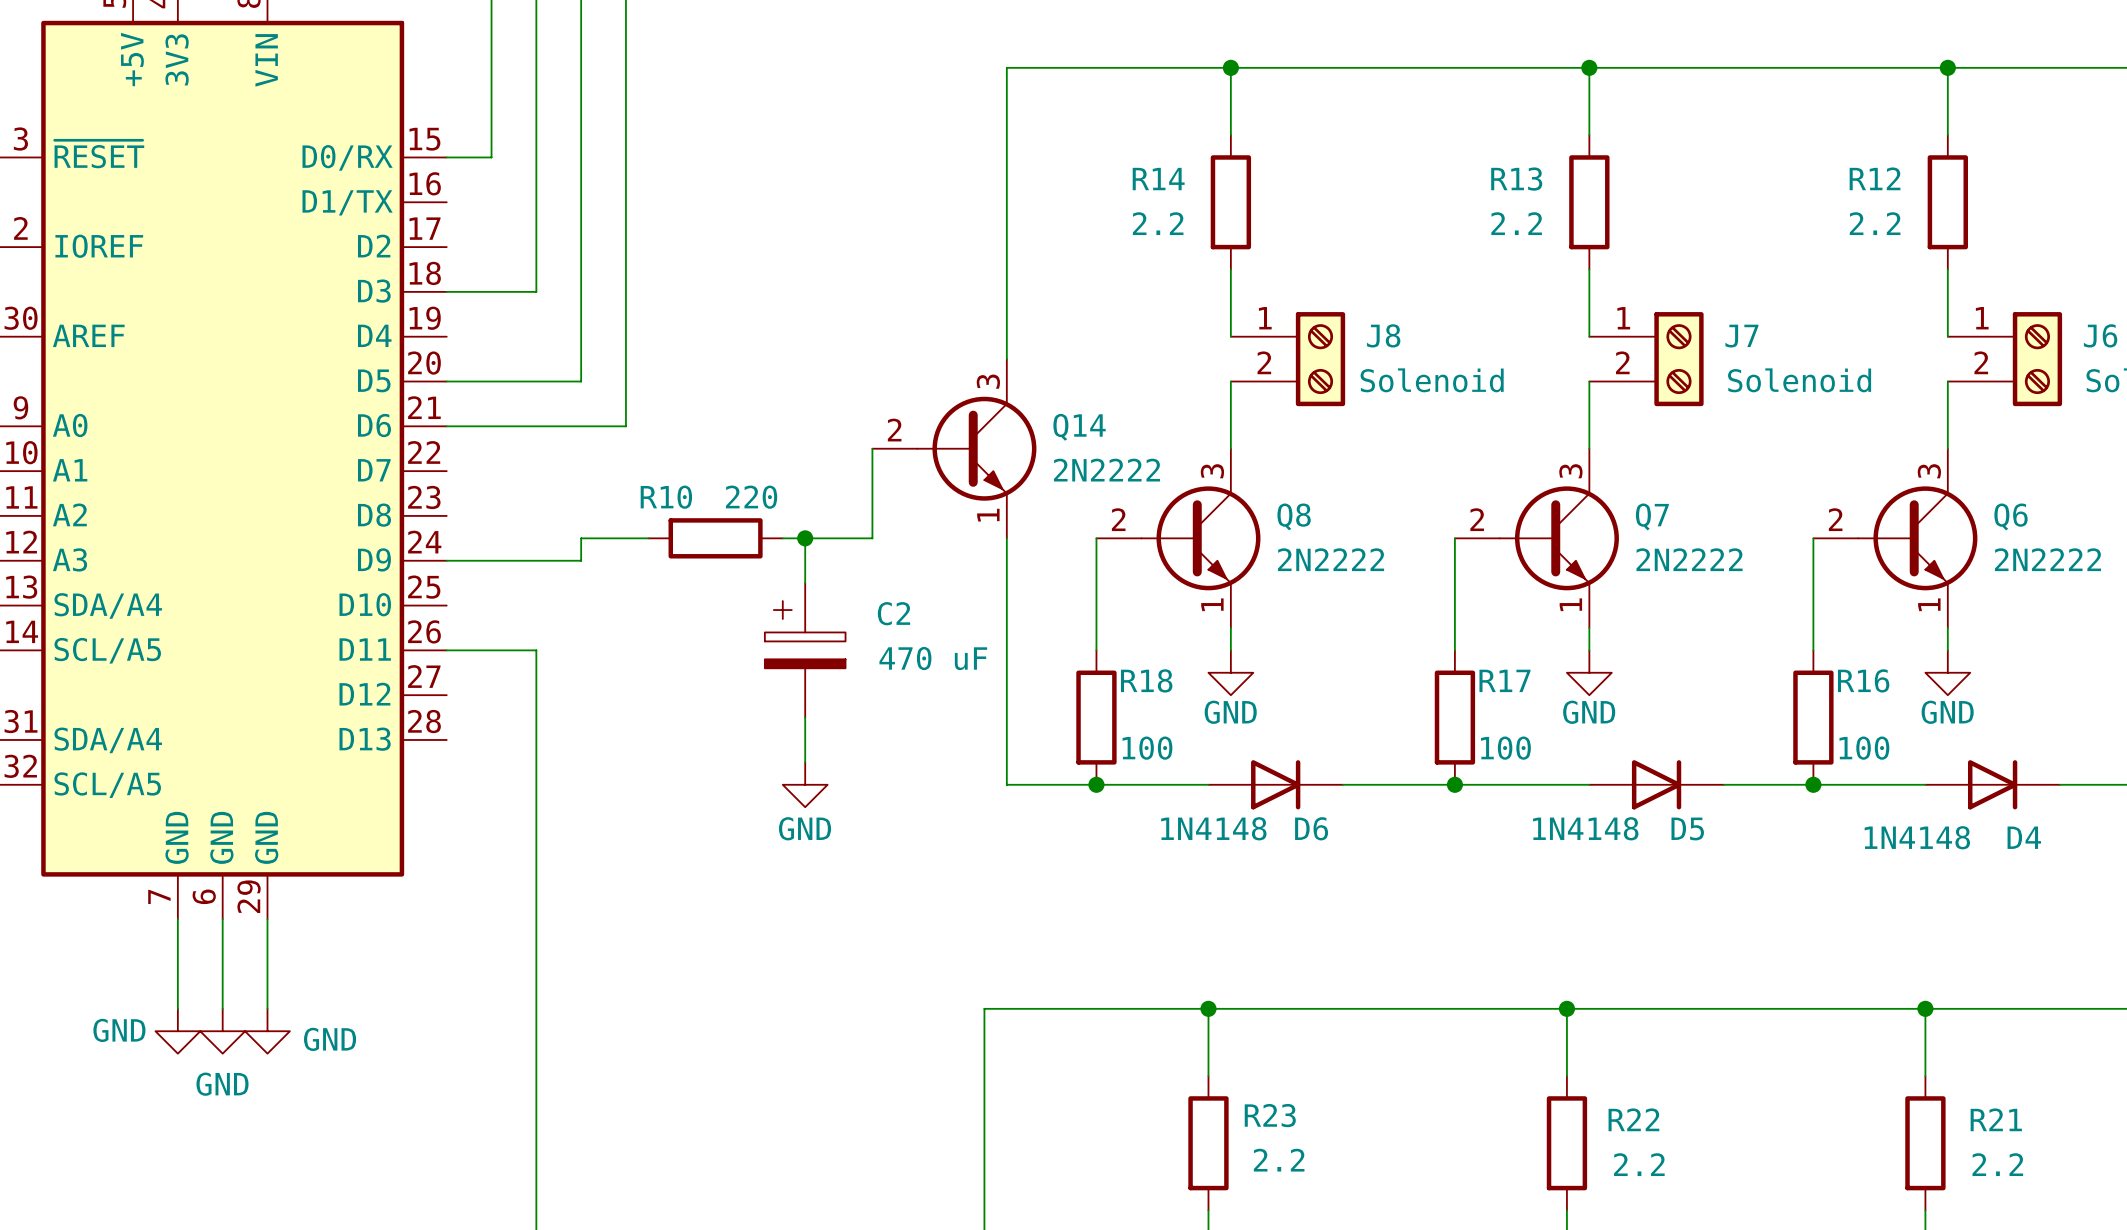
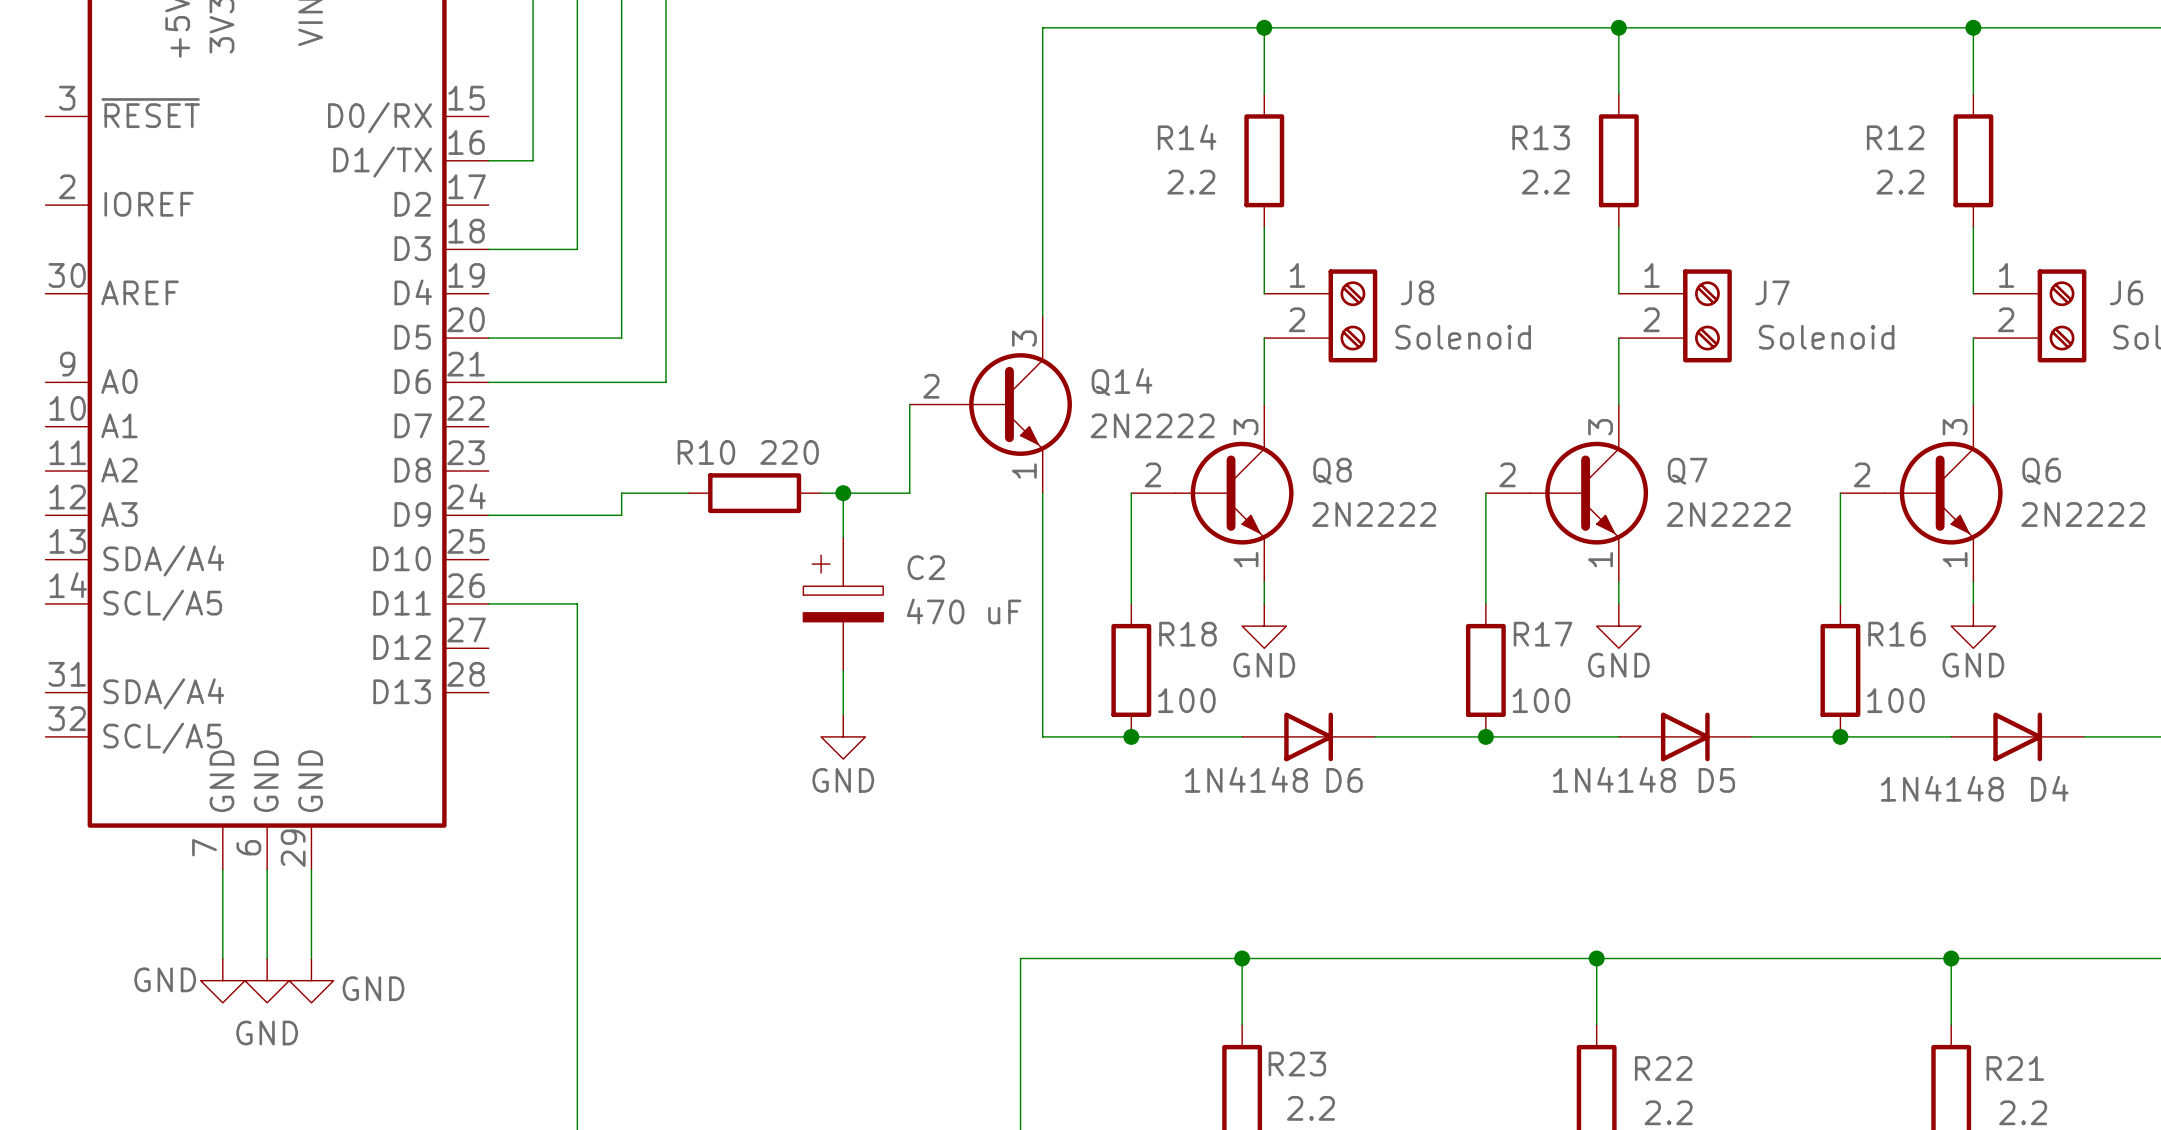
wire: (446, 157) (491, 157) -> (488, 160) (533, 160) (533, 116)

